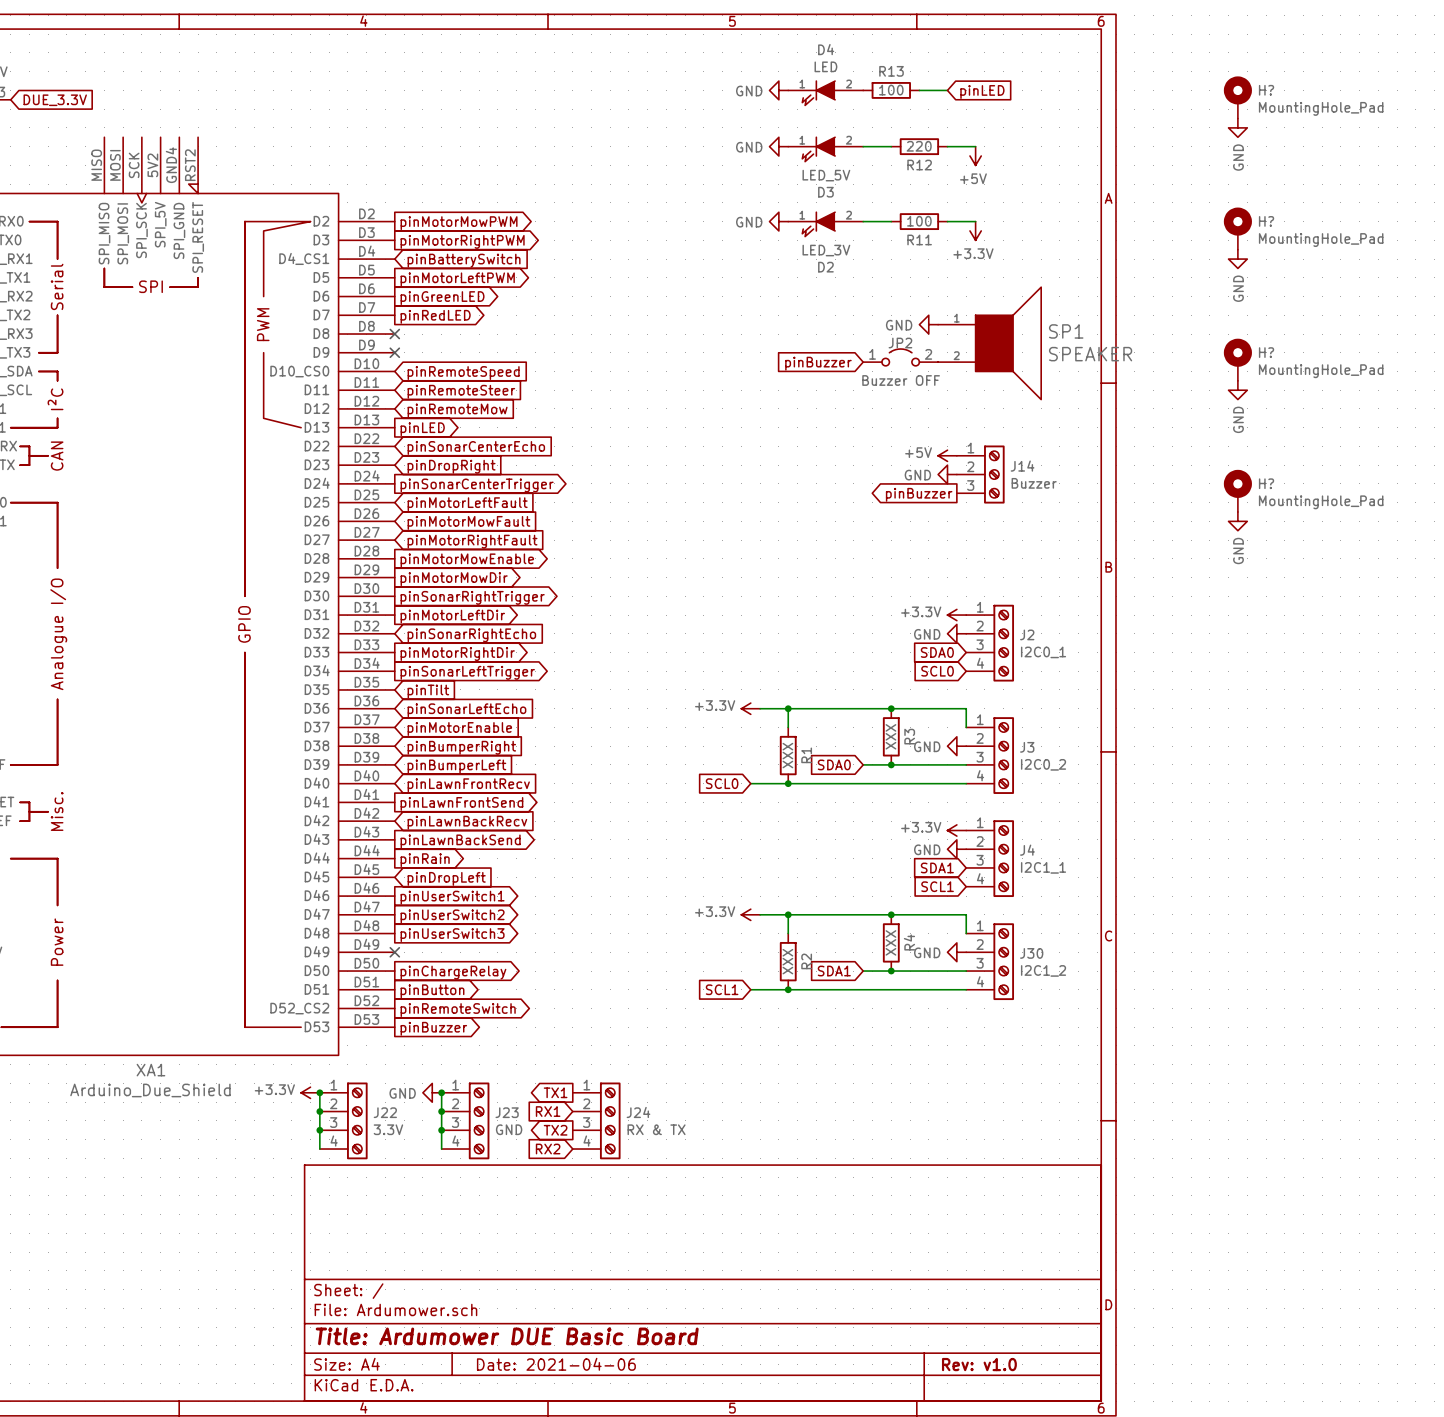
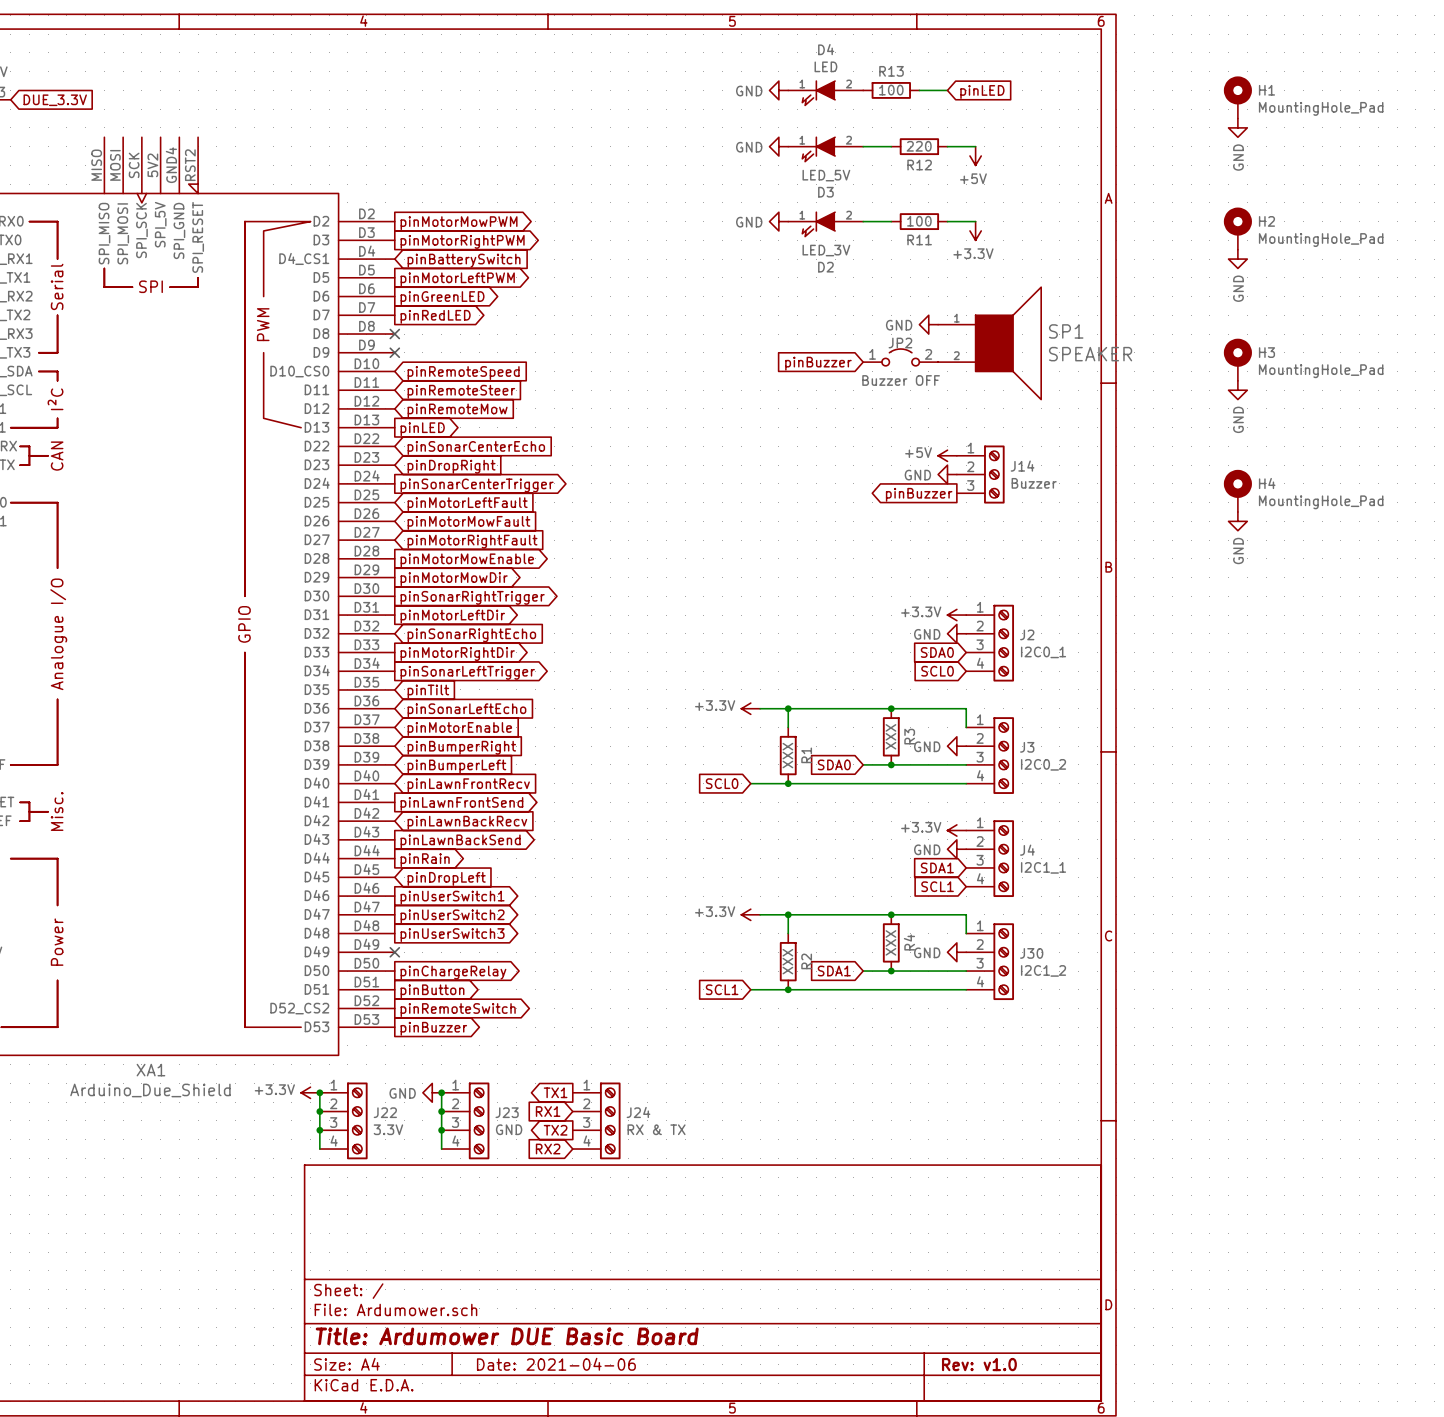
H? name: H? (1266, 90) -> H1 (1266, 90)
H? name: H? (1266, 221) -> H2 (1266, 221)
H? name: H? (1266, 352) -> H3 (1266, 352)
H? name: H? (1266, 483) -> H4 (1267, 483)

